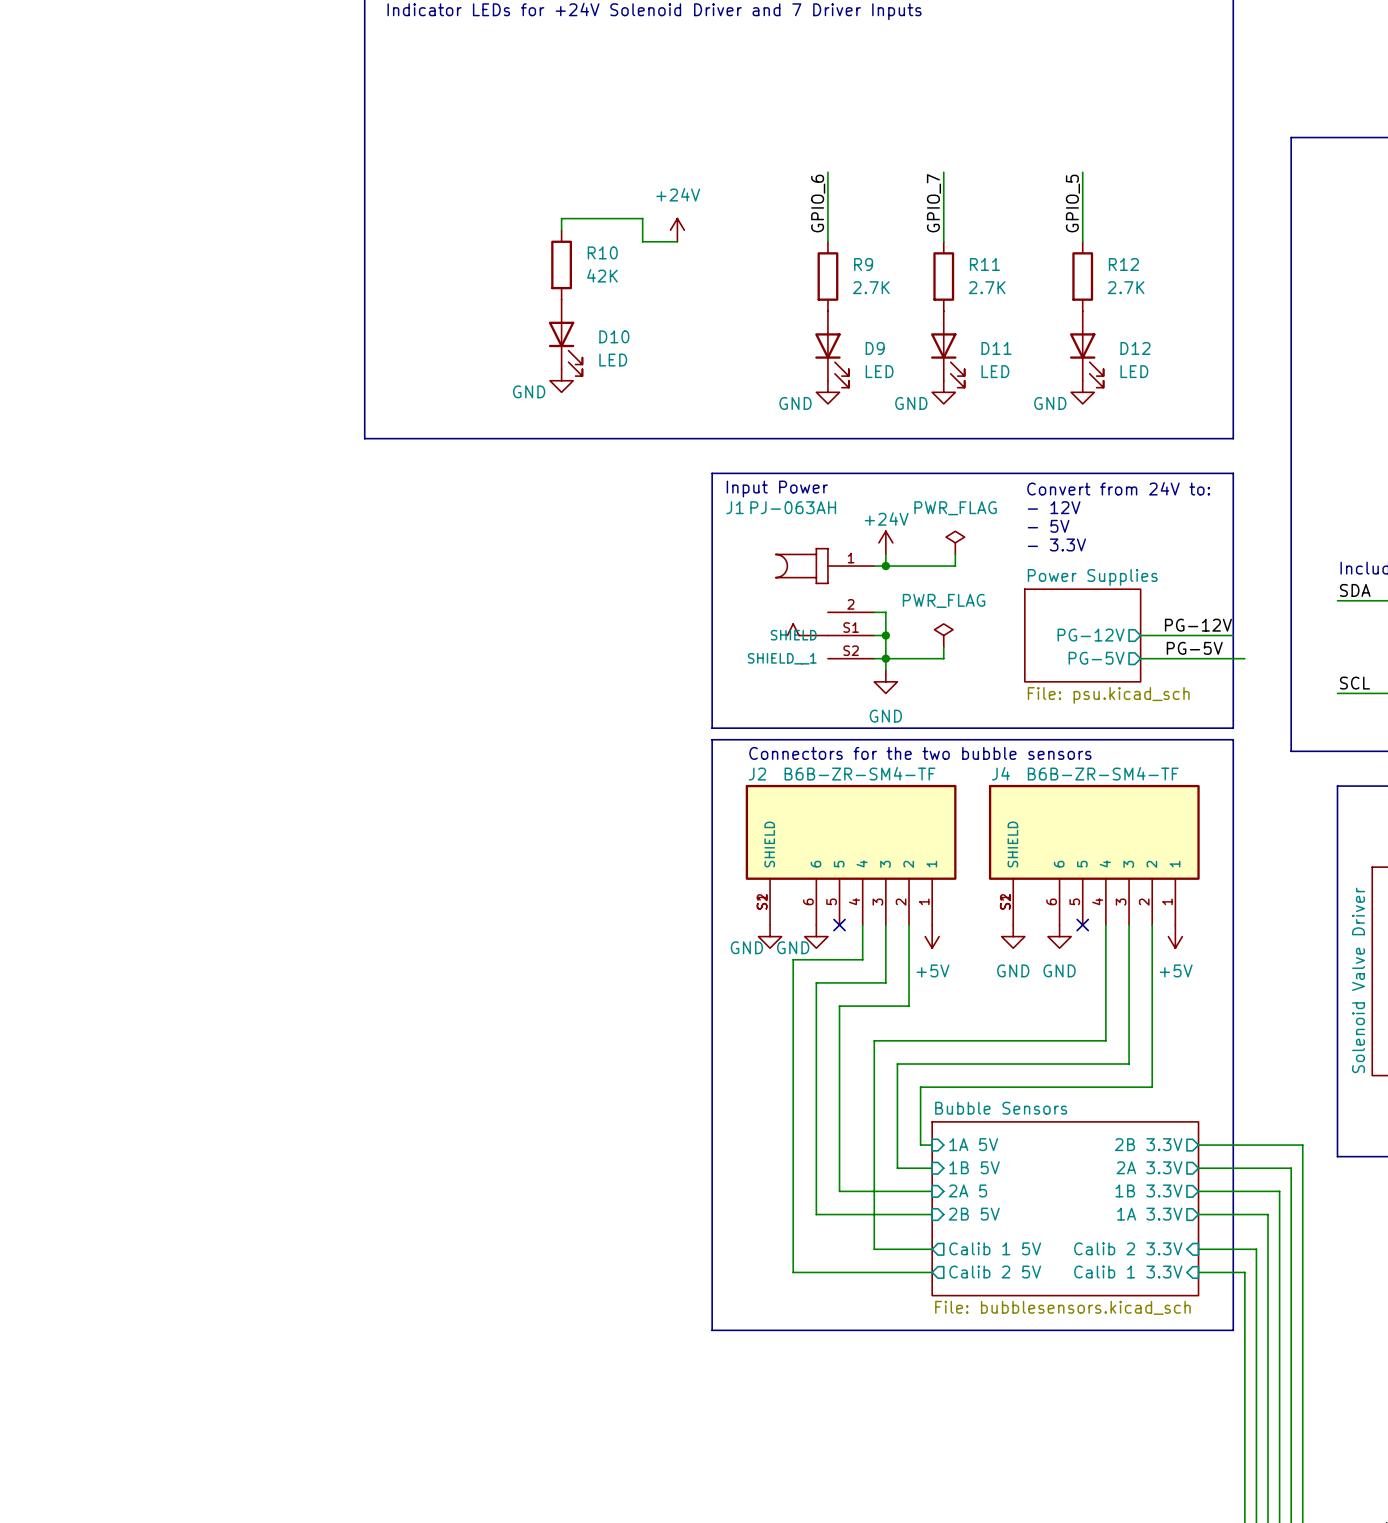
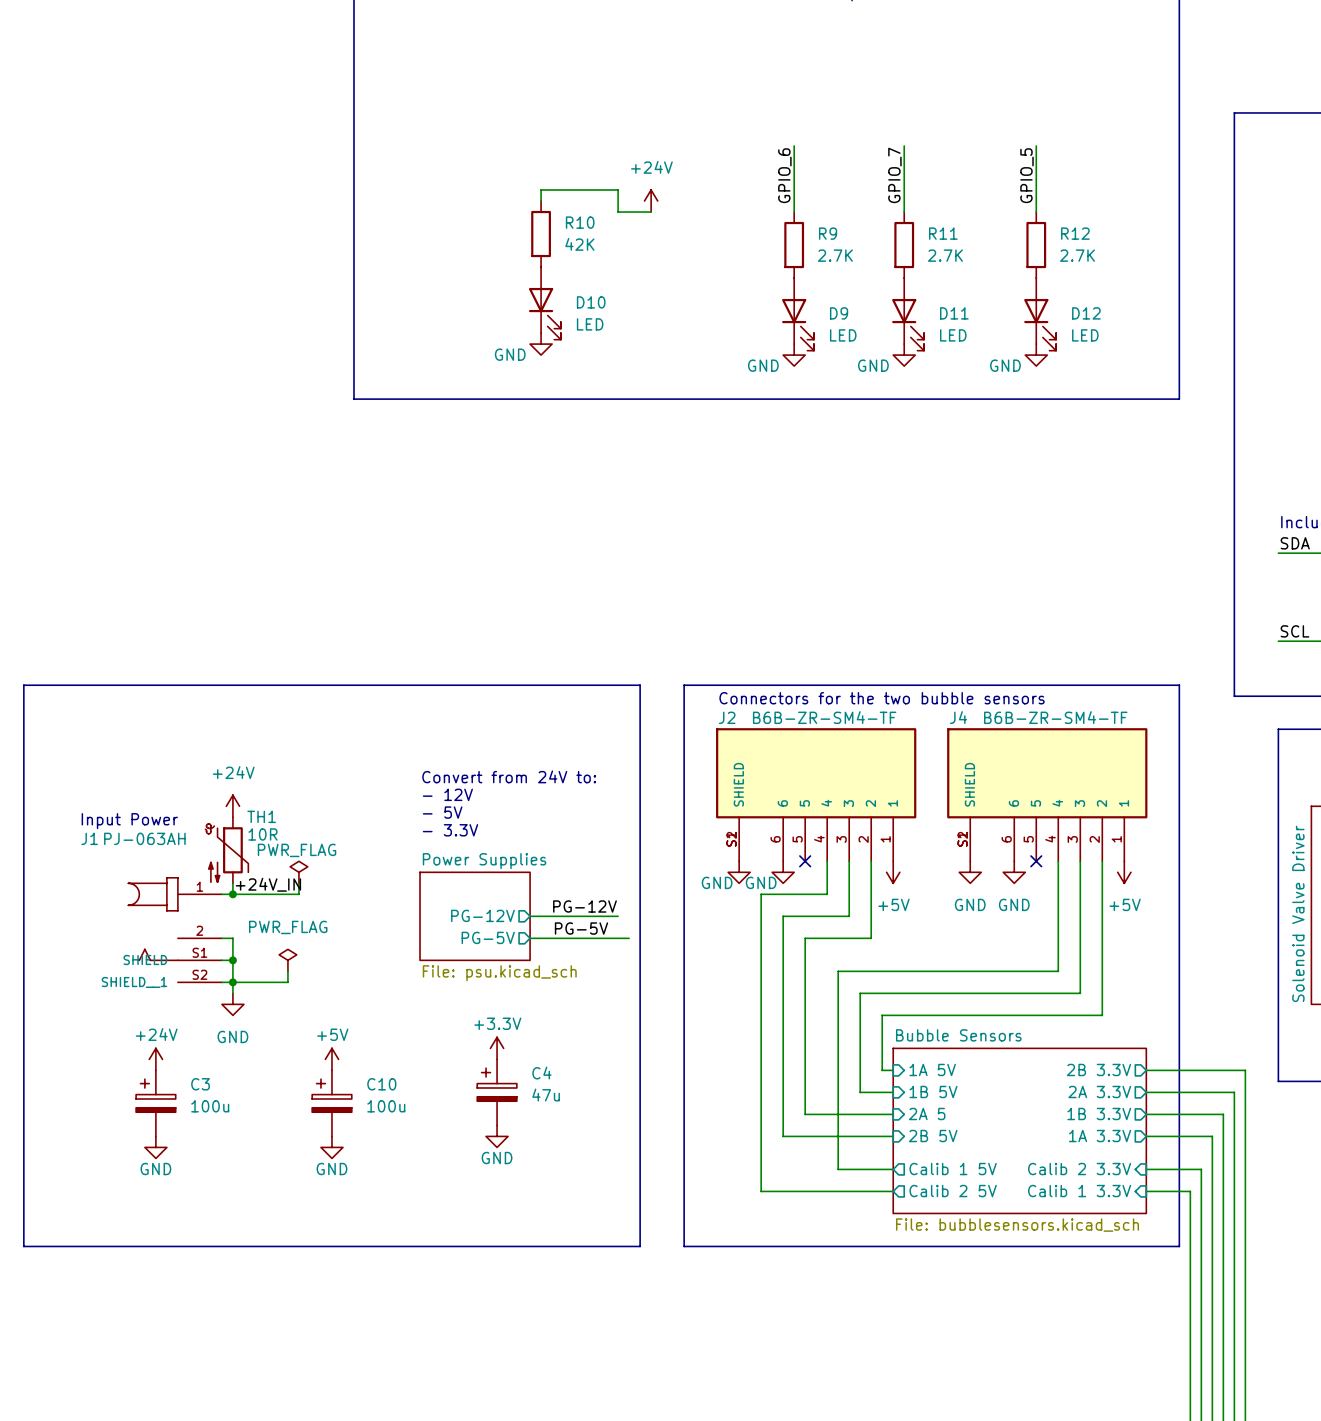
line: (712, 473) (1233, 473) (1233, 728) (712, 728) (712, 473) -> none
text: Input Power (777, 488) -> none
text: Convert from 24V to: (1118, 488) -> none
text: - 12V (1054, 507) -> none
text: - 5V (1048, 526) -> none
power symbol: +24V (885, 542) -> none
power symbol: PWR_FLAG (955, 542) -> none
text: - 3.3V (1056, 544) -> none
wire: (885, 554) (885, 566) -> none
wire: (955, 554) (955, 566) (874, 566) -> none
junction: (885, 566) -> none
J1 position: (824, 603) -> (174, 929)
wire: (874, 612) (885, 612) (885, 670) -> none
label: PG-12V (1198, 625) -> none
wire: (874, 635) (885, 635) -> none
junction: (885, 635) -> none
power symbol: PWR_FLAG (943, 635) -> none
sheet Power Supplies: File: psu.kicad_sch (1082, 635) -> none
sheet pin: PG-12V (1091, 635) -> none
wire: (1140, 635) (1233, 635) -> none
wire: (943, 647) (943, 658) (874, 658) -> none
label: PG-5V (1194, 648) -> none
junction: (885, 658) -> none
sheet pin: PG-5V (1096, 658) -> none
wire: (1140, 658) (1244, 658) -> none
power symbol: GND (885, 681) -> none
line: none -> (23, 685) (640, 685) (640, 1246) (23, 1246) (23, 685)
text: none -> Convert from 24V to: (509, 776)
text: none -> - 12V (447, 794)
power symbol: none -> +24V (232, 806)
text: none -> - 5V (442, 812)
text: none -> Input Power (129, 821)
text: none -> - 3.3V (450, 830)
TH1: none -> 10R (226, 850)
power symbol: none -> PWR_FLAG (298, 872)
wire: none -> (232, 883) (232, 894)
wire: none -> (298, 883) (298, 894) (221, 894)
label: none -> +24V_IN (268, 884)
junction: none -> (232, 894)
label: none -> PG-12V (585, 906)
sheet Power Supplies: none -> File: psu.kicad_sch (475, 916)
sheet pin: none -> PG-12V (482, 915)
wire: none -> (530, 916) (618, 916)
label: none -> PG-5V (581, 928)
sheet pin: none -> PG-5V (488, 937)
wire: none -> (221, 938) (232, 938) (232, 993)
wire: none -> (530, 938) (629, 938)
wire: none -> (221, 960) (232, 960)
junction: none -> (232, 960)
power symbol: none -> PWR_FLAG (287, 960)
wire: none -> (287, 971) (287, 982) (221, 982)
junction: none -> (232, 982)
power symbol: none -> GND (232, 1004)
power symbol: none -> +3.3V (497, 1048)
power symbol: none -> +24V (155, 1059)
power symbol: none -> +5V (331, 1059)
C4: none -> 47u (497, 1092)
C3: none -> 100u (155, 1103)
C10: none -> 100u (331, 1103)
power symbol: none -> GND (497, 1136)
power symbol: none -> GND (155, 1147)
power symbol: none -> GND (331, 1147)

